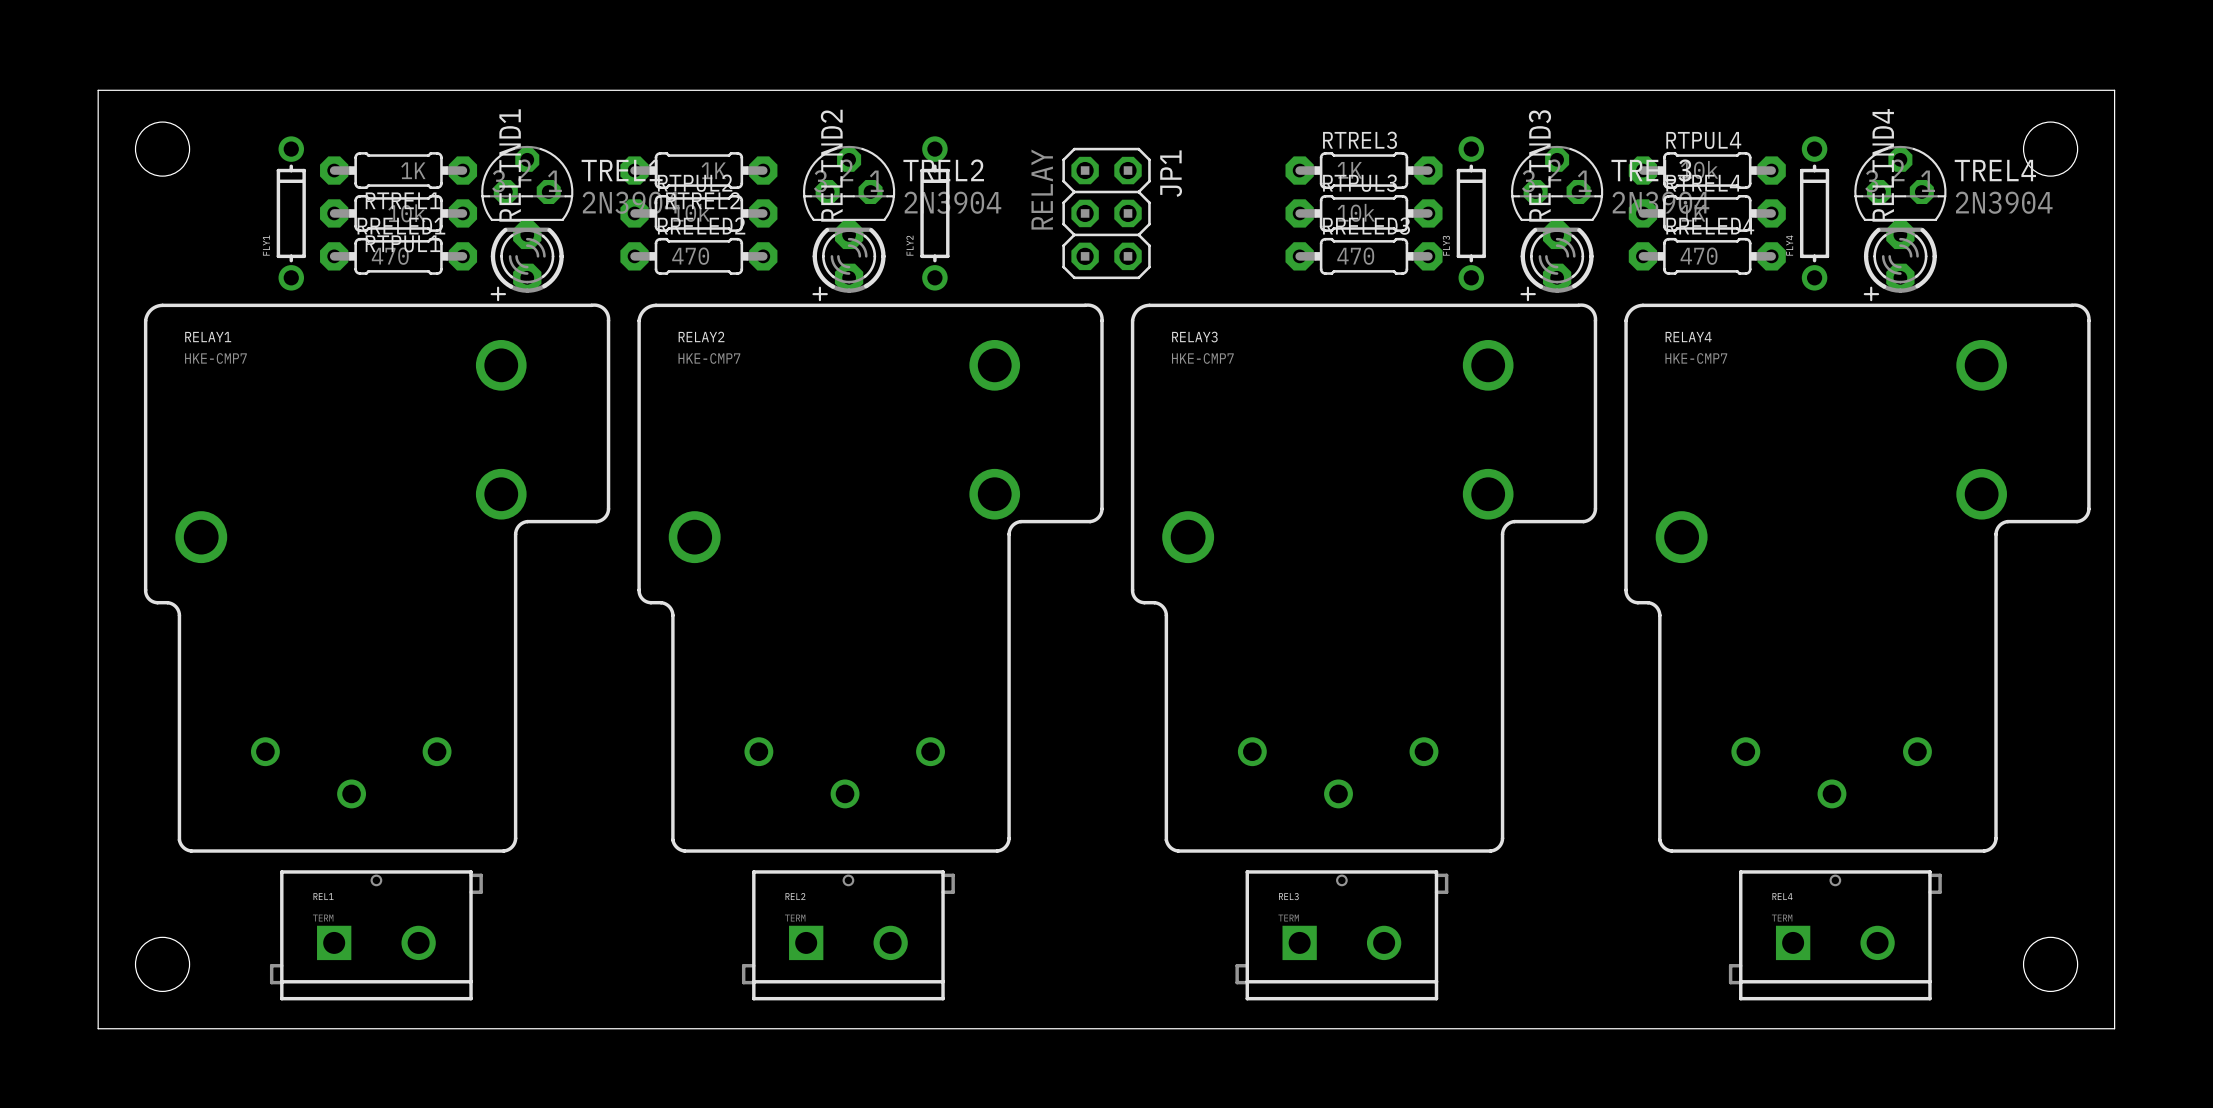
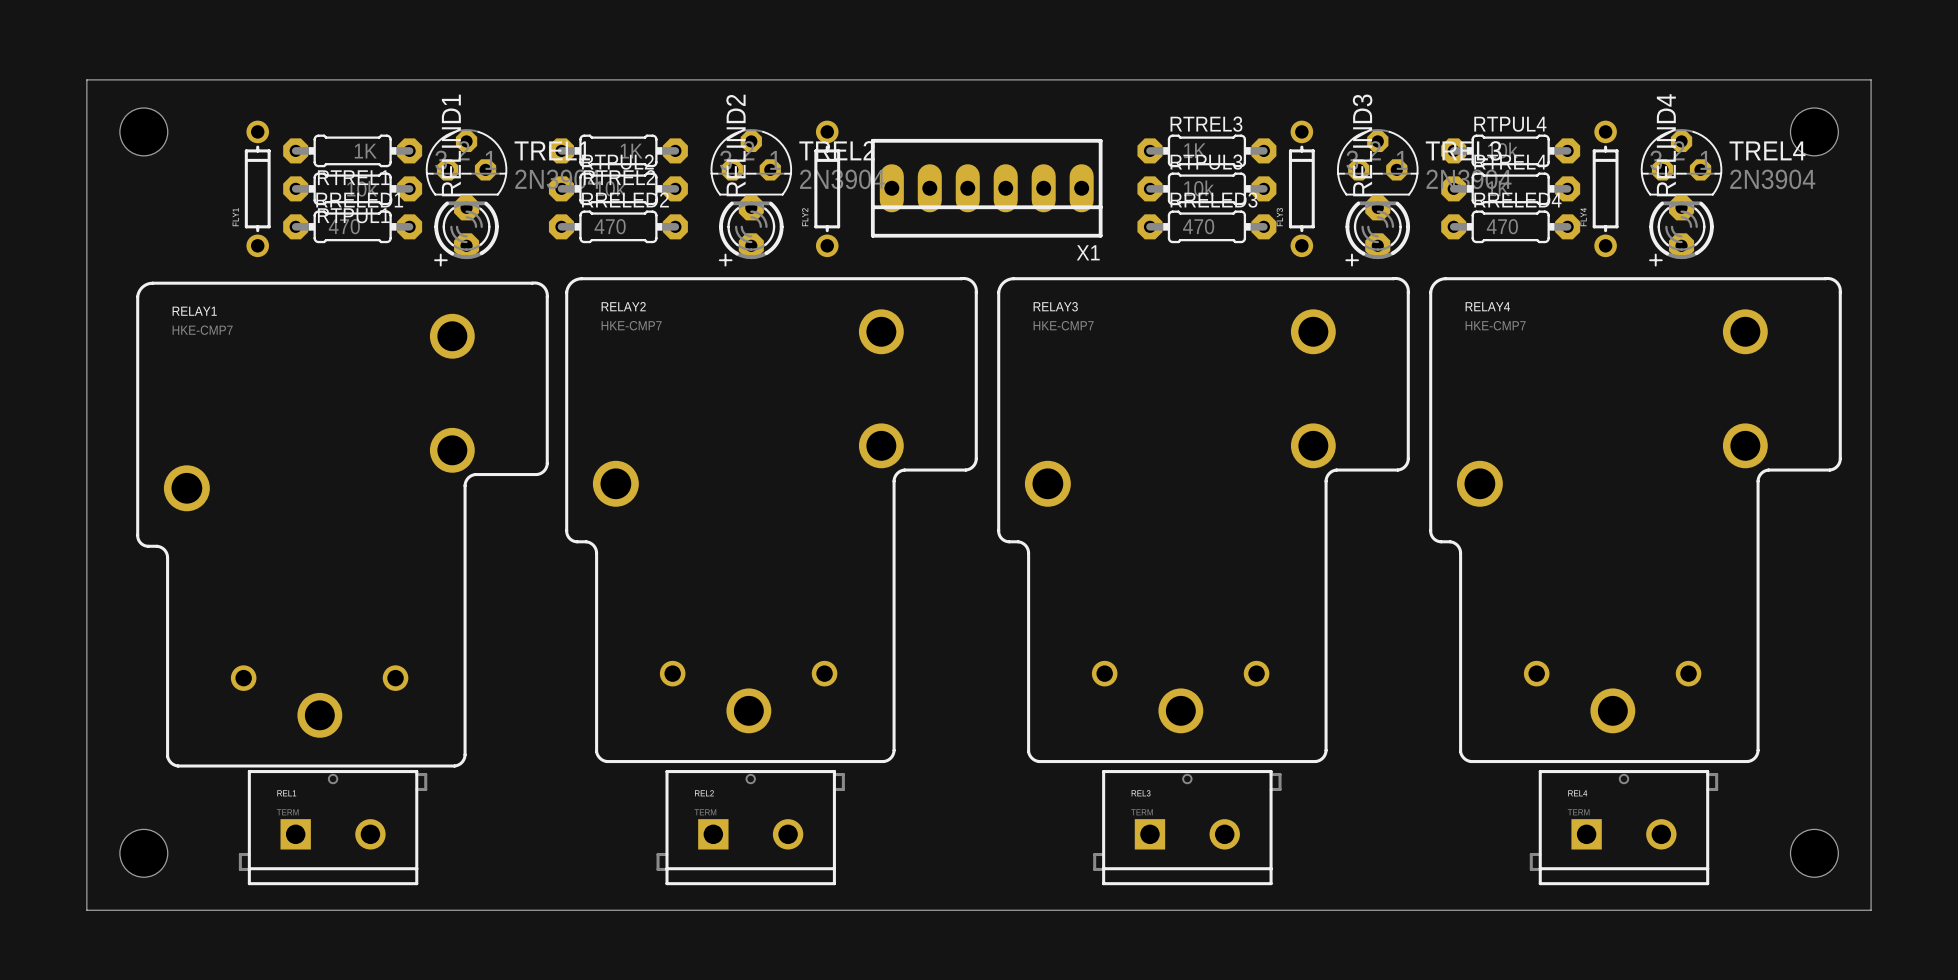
X1: none -> (986, 188)
JP1: RELAY (1106, 213) -> none
RELAY1 footprint: [143, 303, 611, 853] -> [136, 281, 549, 768]
RELAY2 footprint: [637, 303, 1104, 853] -> [565, 276, 978, 764]
RELAY3 footprint: [1130, 303, 1598, 853] -> [997, 276, 1410, 764]
RELAY4 footprint: [1624, 303, 2091, 853] -> [1429, 276, 1842, 764]

